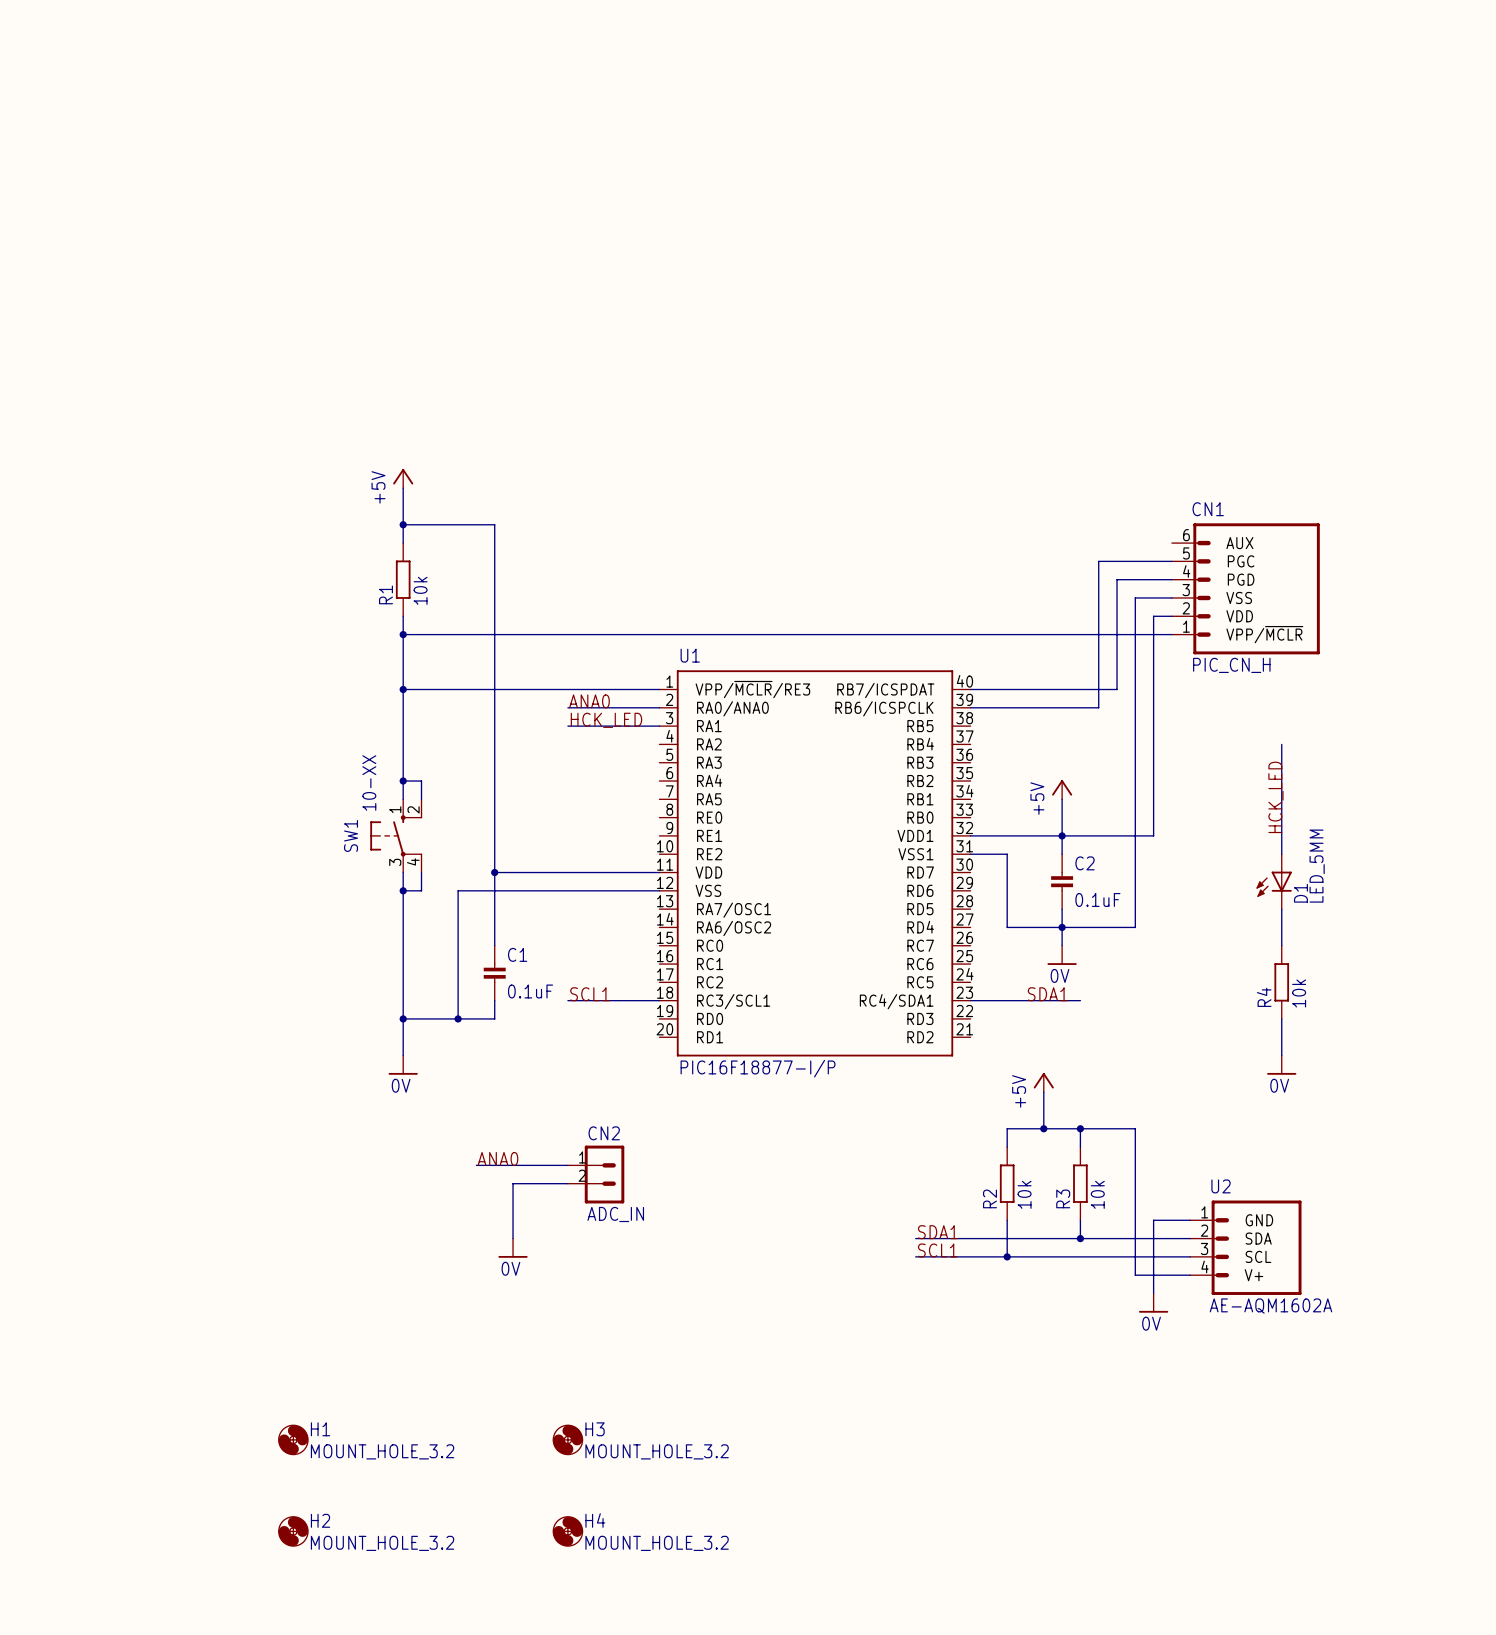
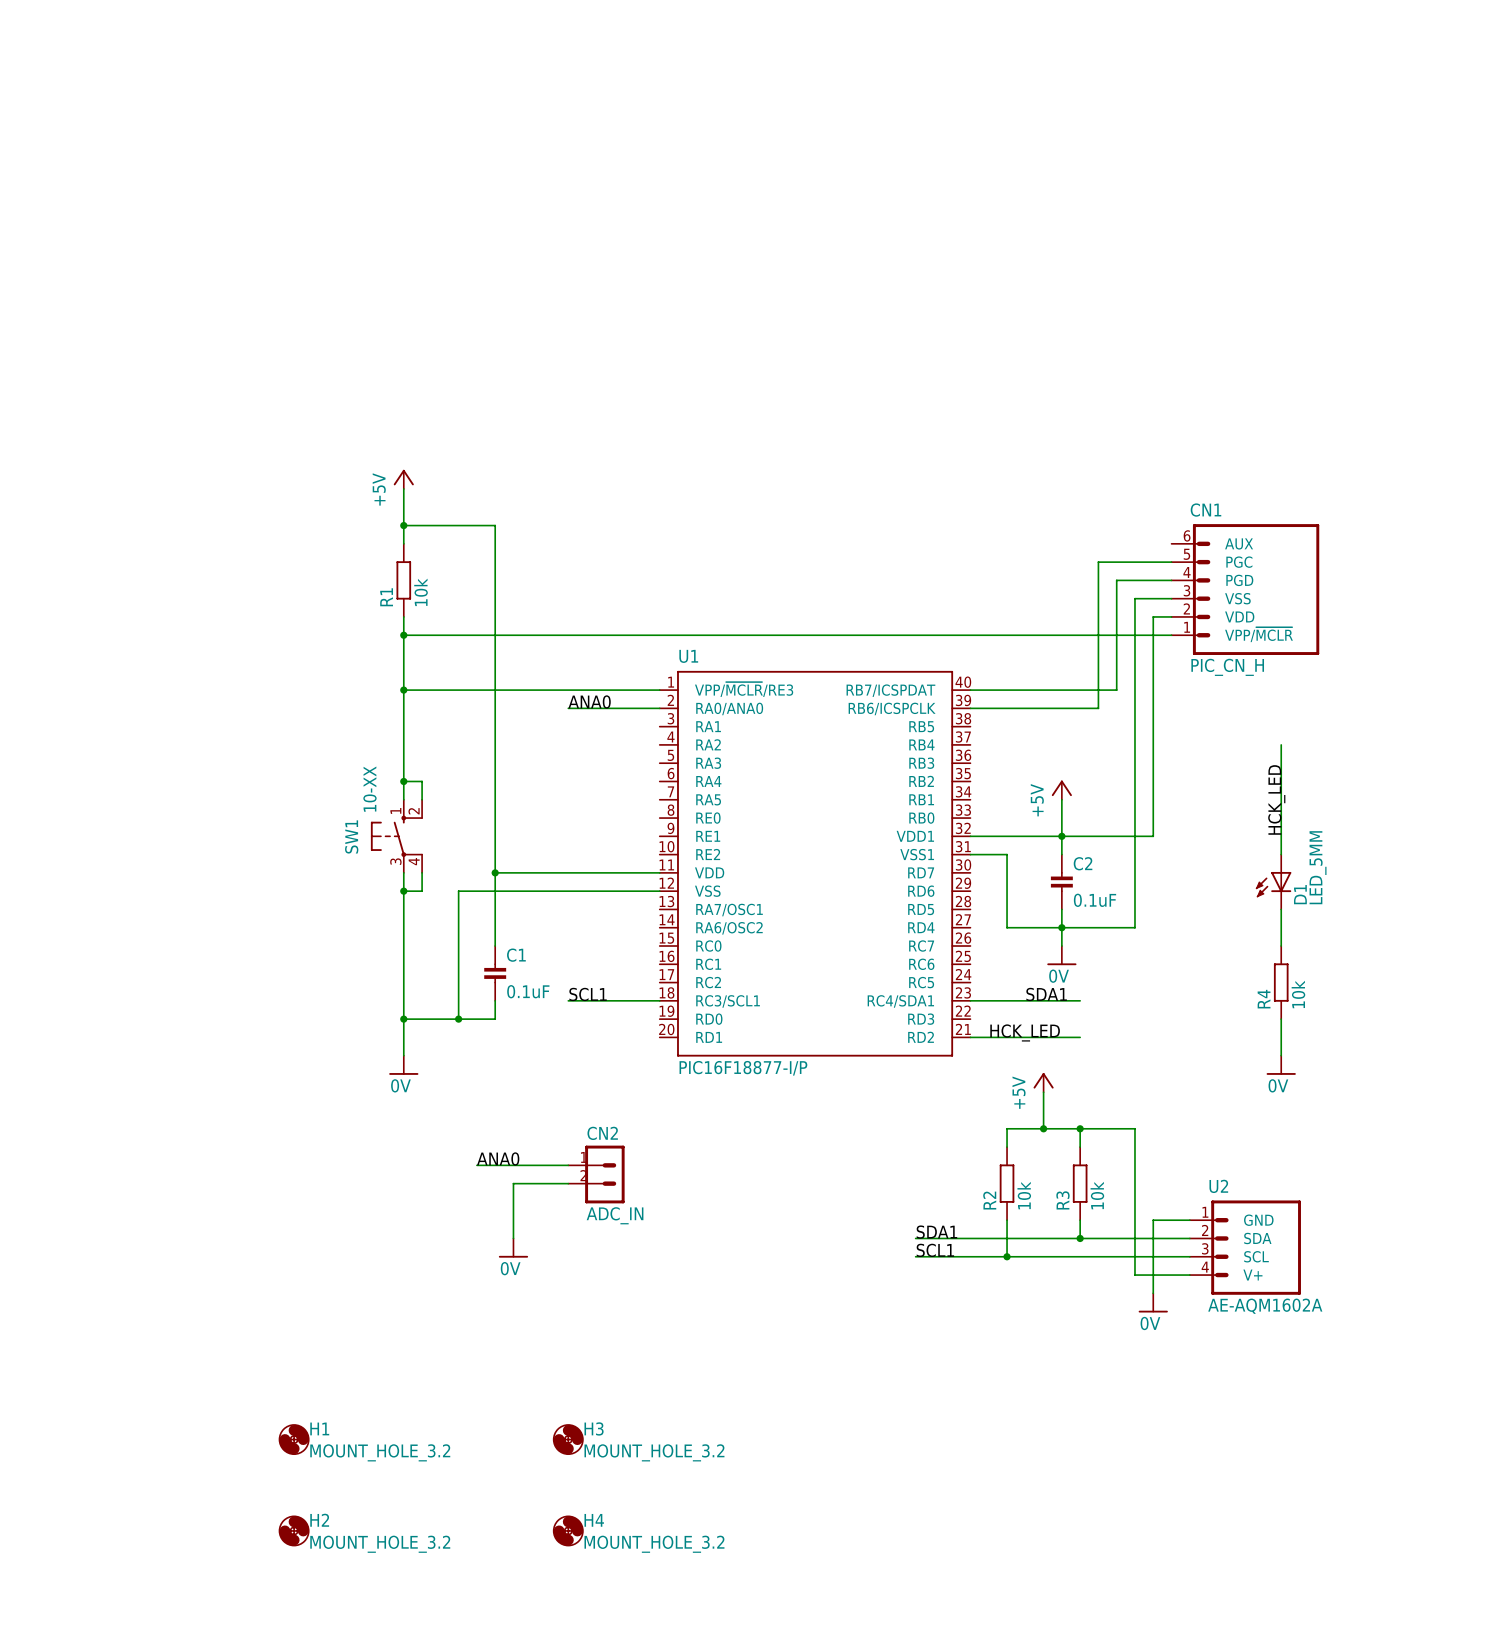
label: HCK_LED (606, 720) -> none
wire: (567, 726) (659, 726) -> none
label: none -> HCK_LED (1025, 1032)
wire: none -> (970, 1037) (1080, 1037)

